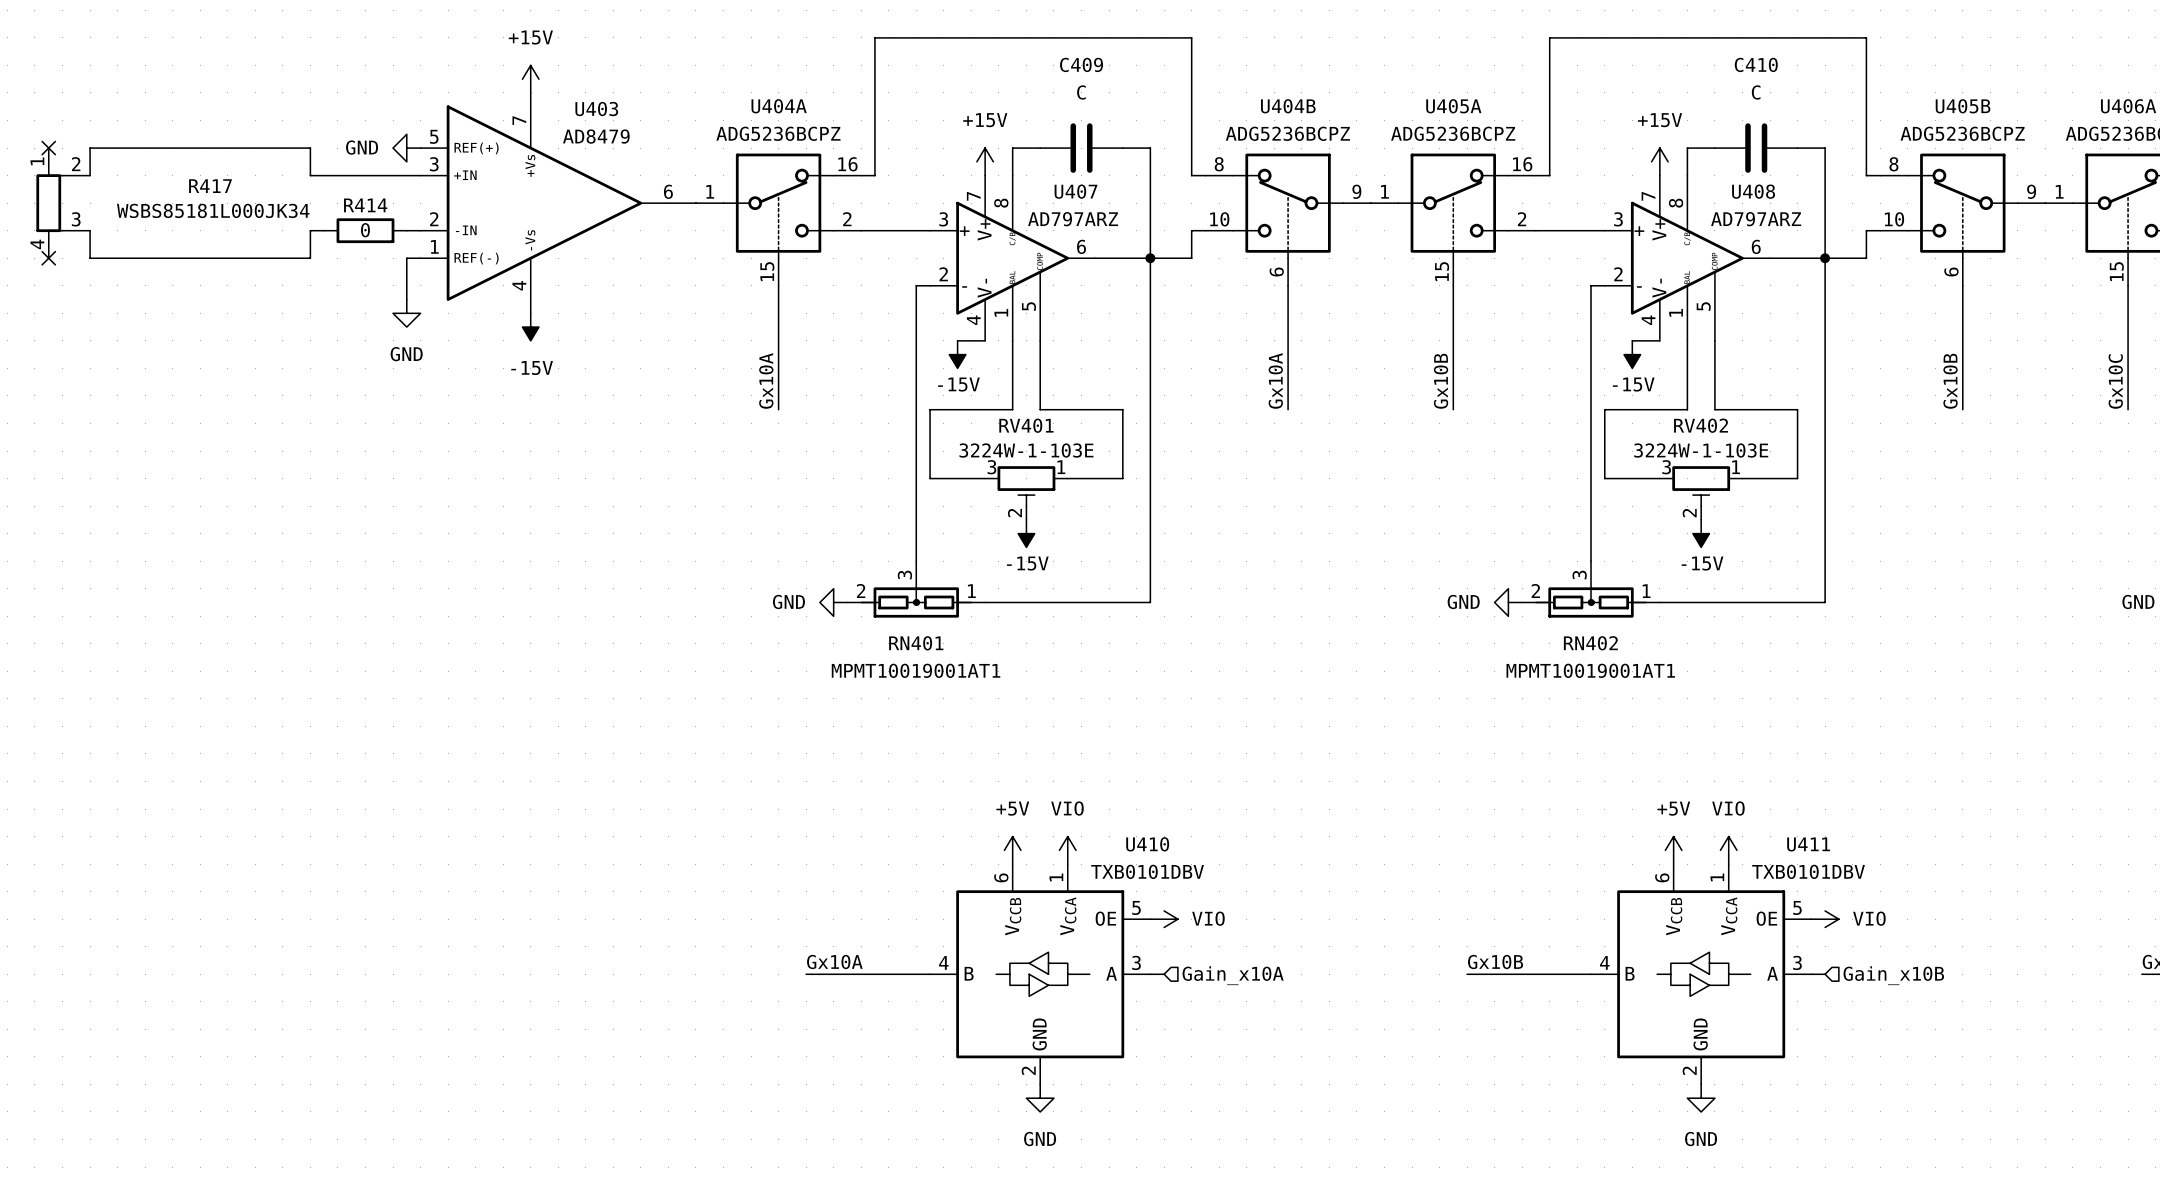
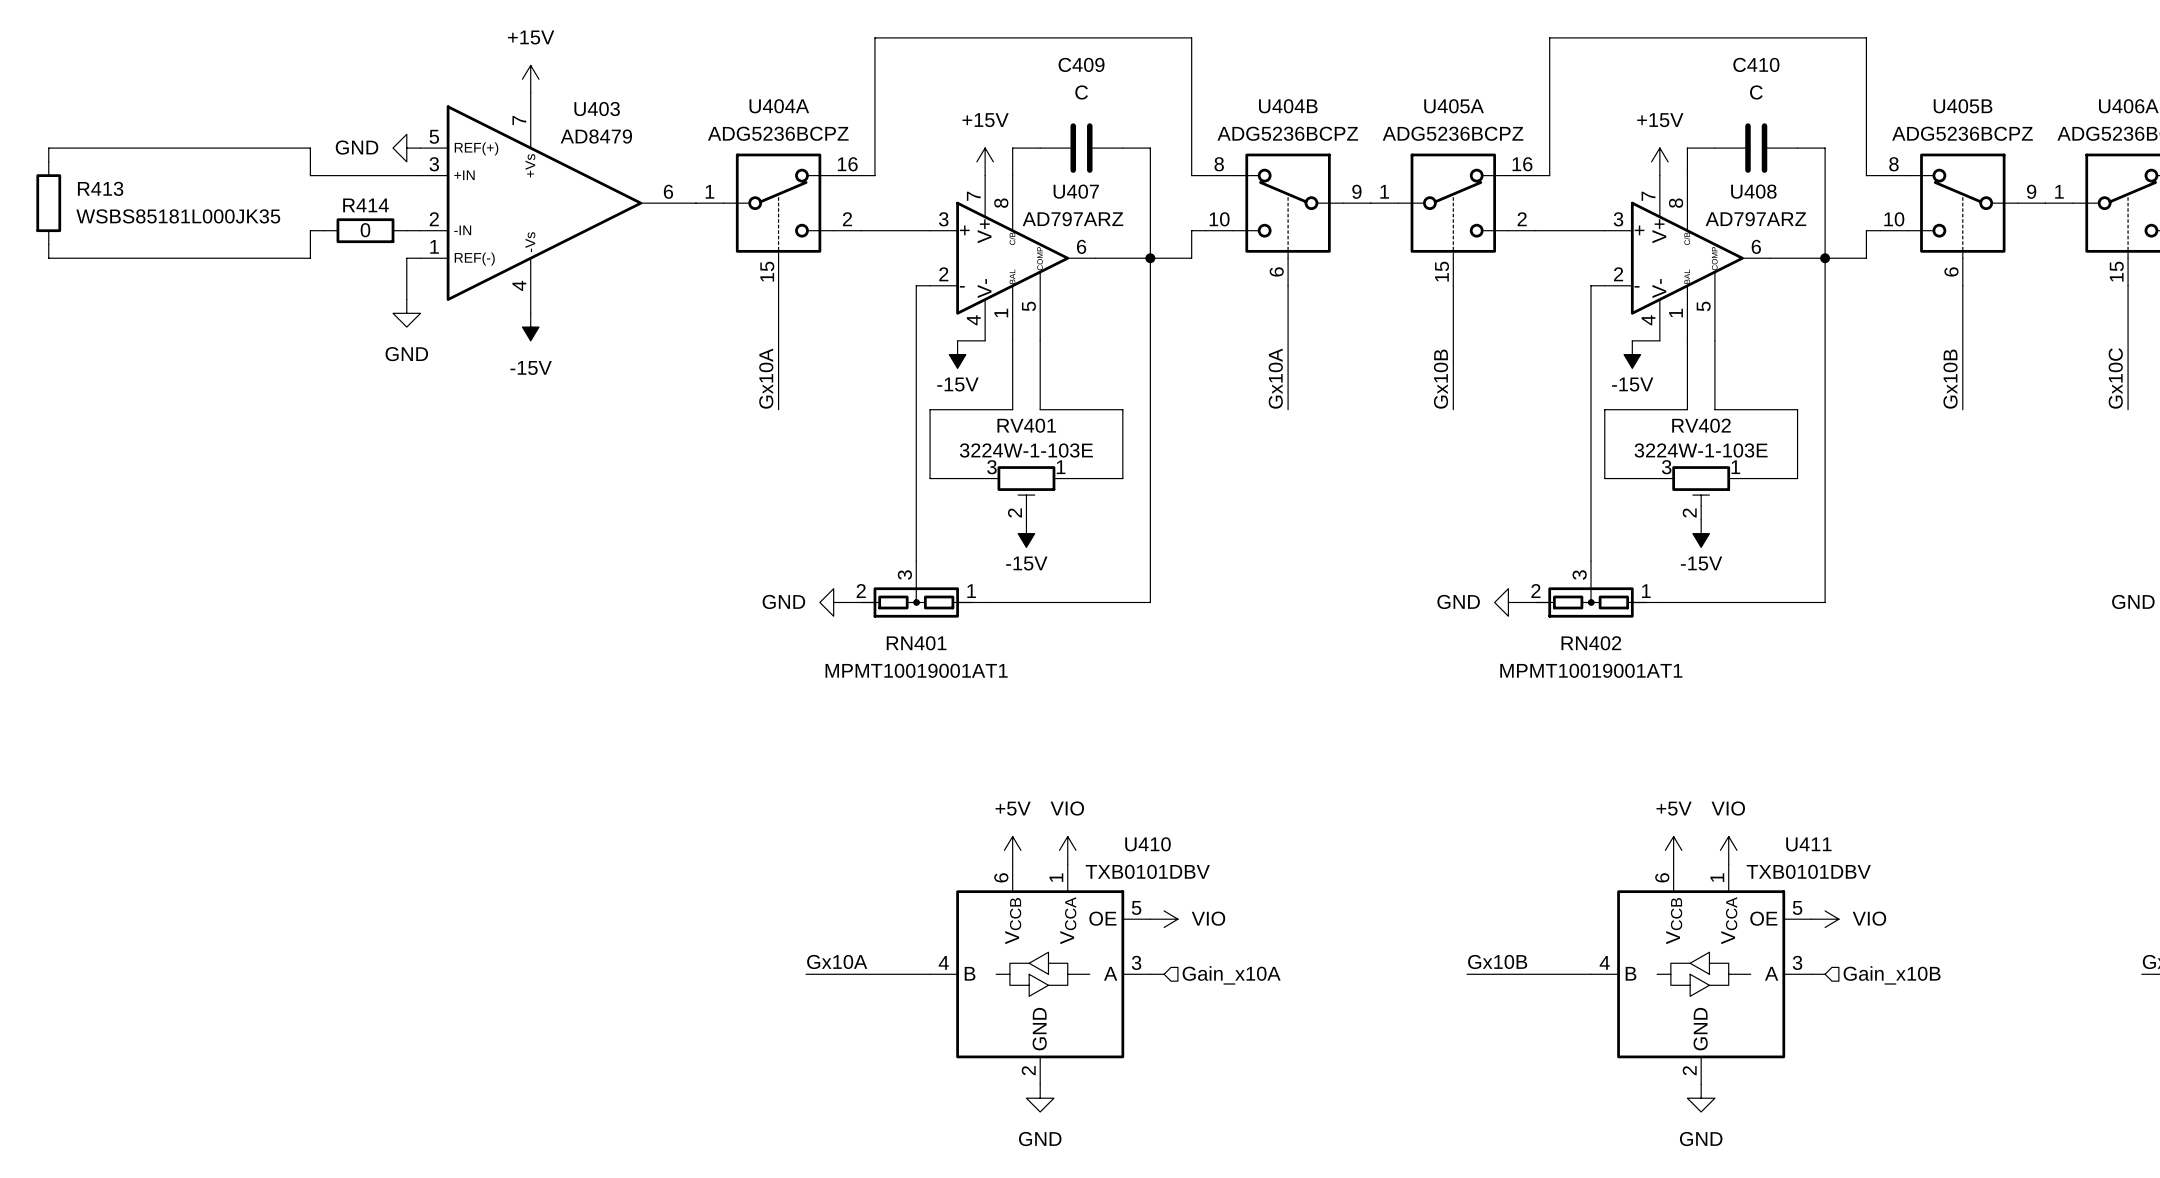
no-connect mark: (48, 148) -> none
wire: (90, 148) (90, 175) -> (90, 148) (48, 148) (48, 161)
R413: none -> WSBS85181L000JK35 (48, 203)
R417: WSBS85181L000JK34 (63, 203) -> none
wire: (90, 230) (90, 258) -> (48, 244) (48, 258) (90, 258)
no-connect mark: (48, 258) -> none

